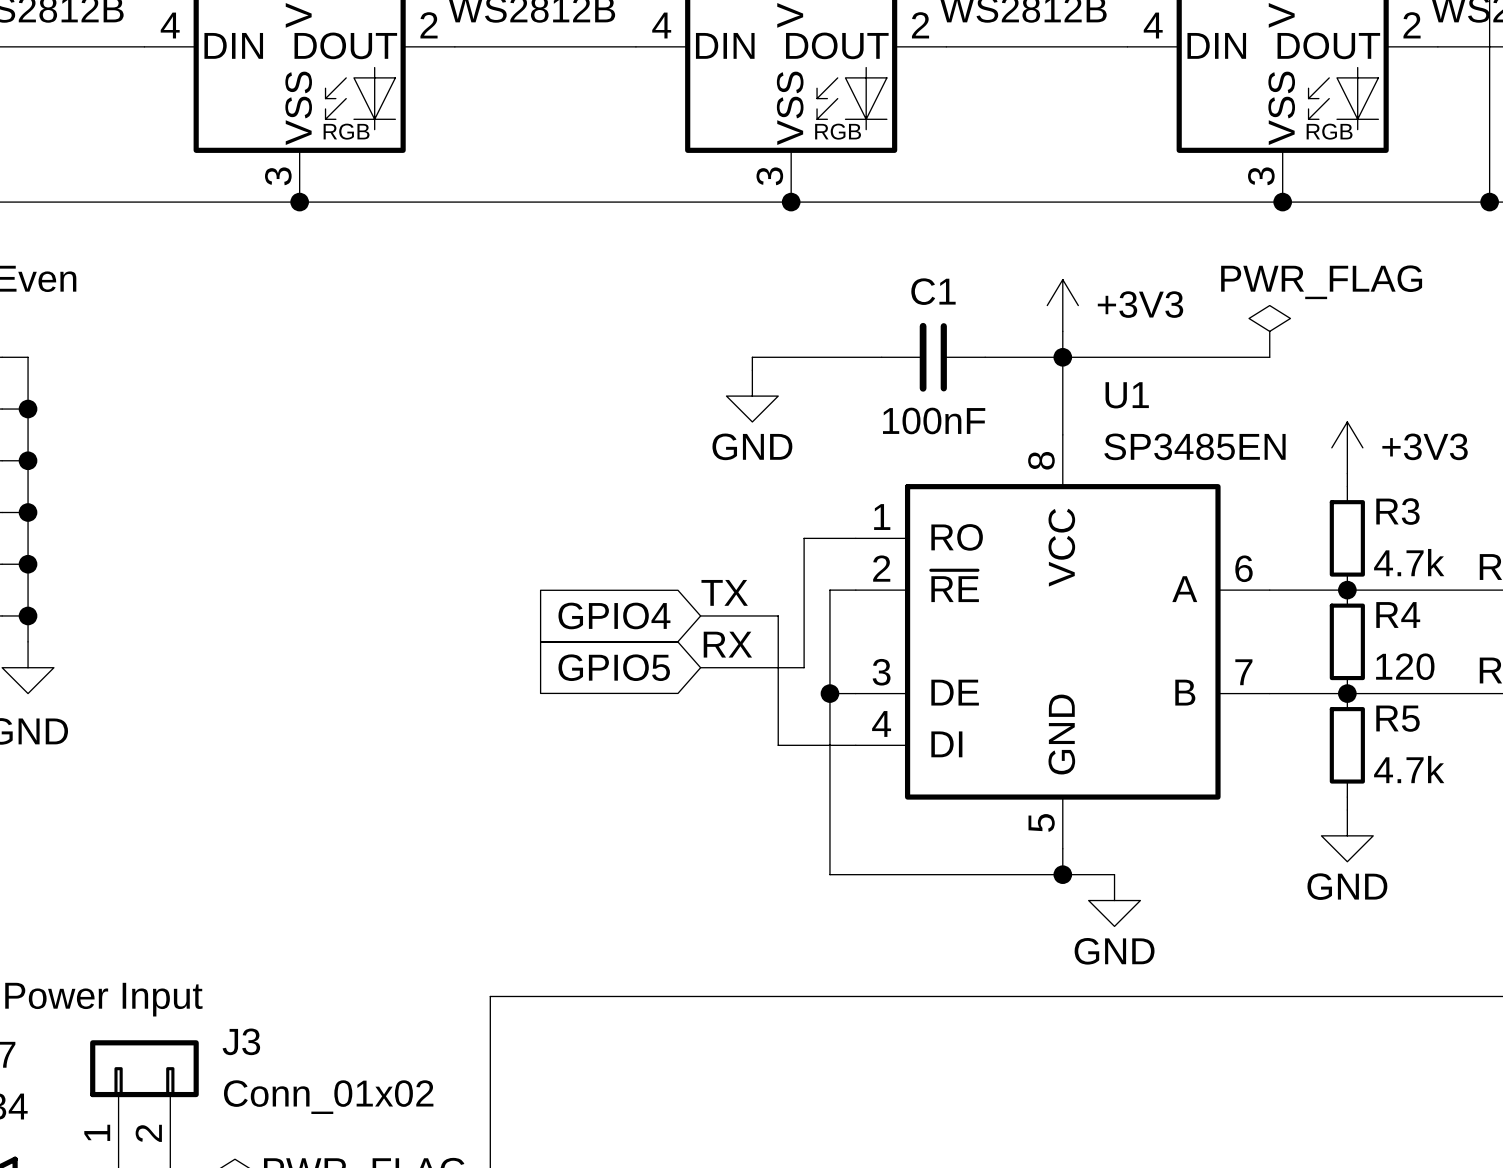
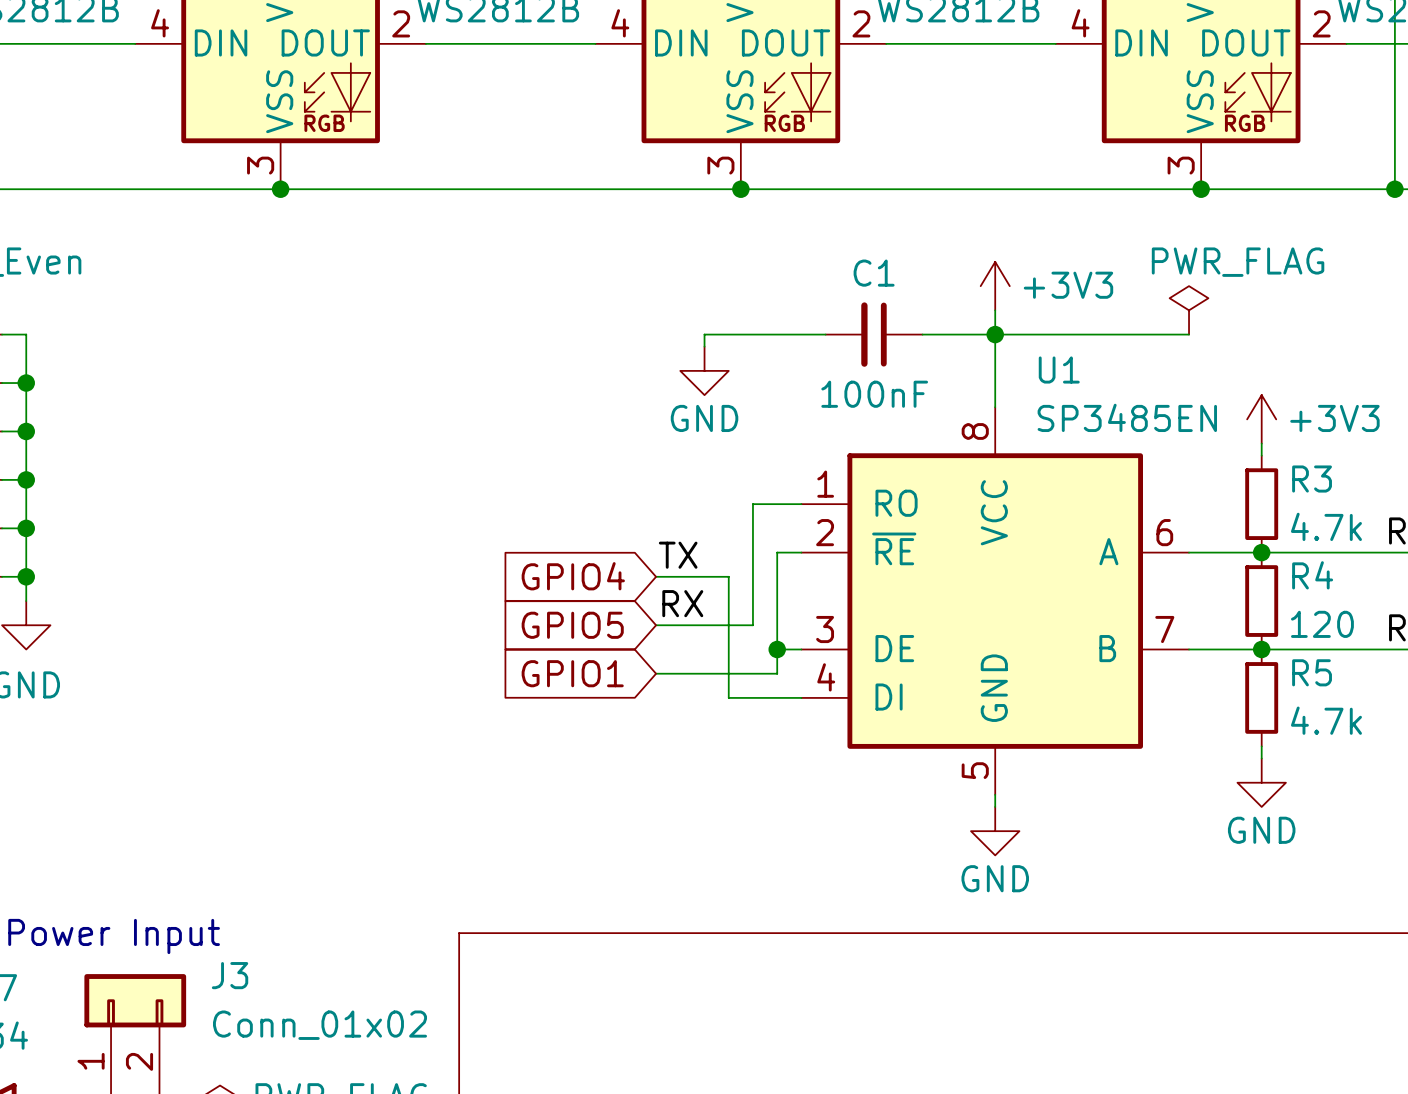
global label: none -> GPIO1 (572, 673)
wire: (829, 719) (829, 874) (1114, 874) -> (777, 673) (656, 673)
junction: (1062, 874) -> none
power symbol position: GND (1114, 900) -> GND (995, 831)

